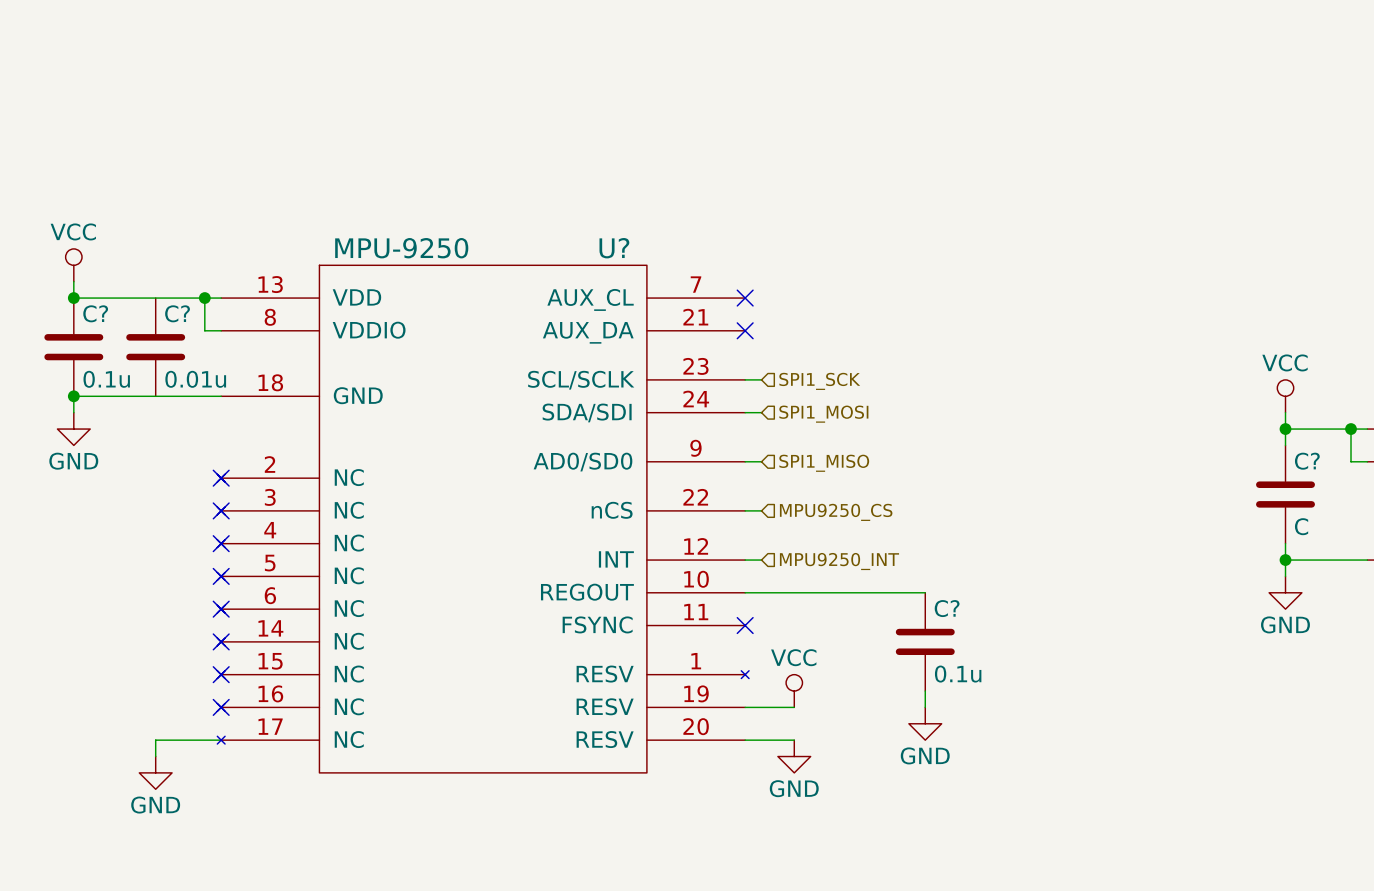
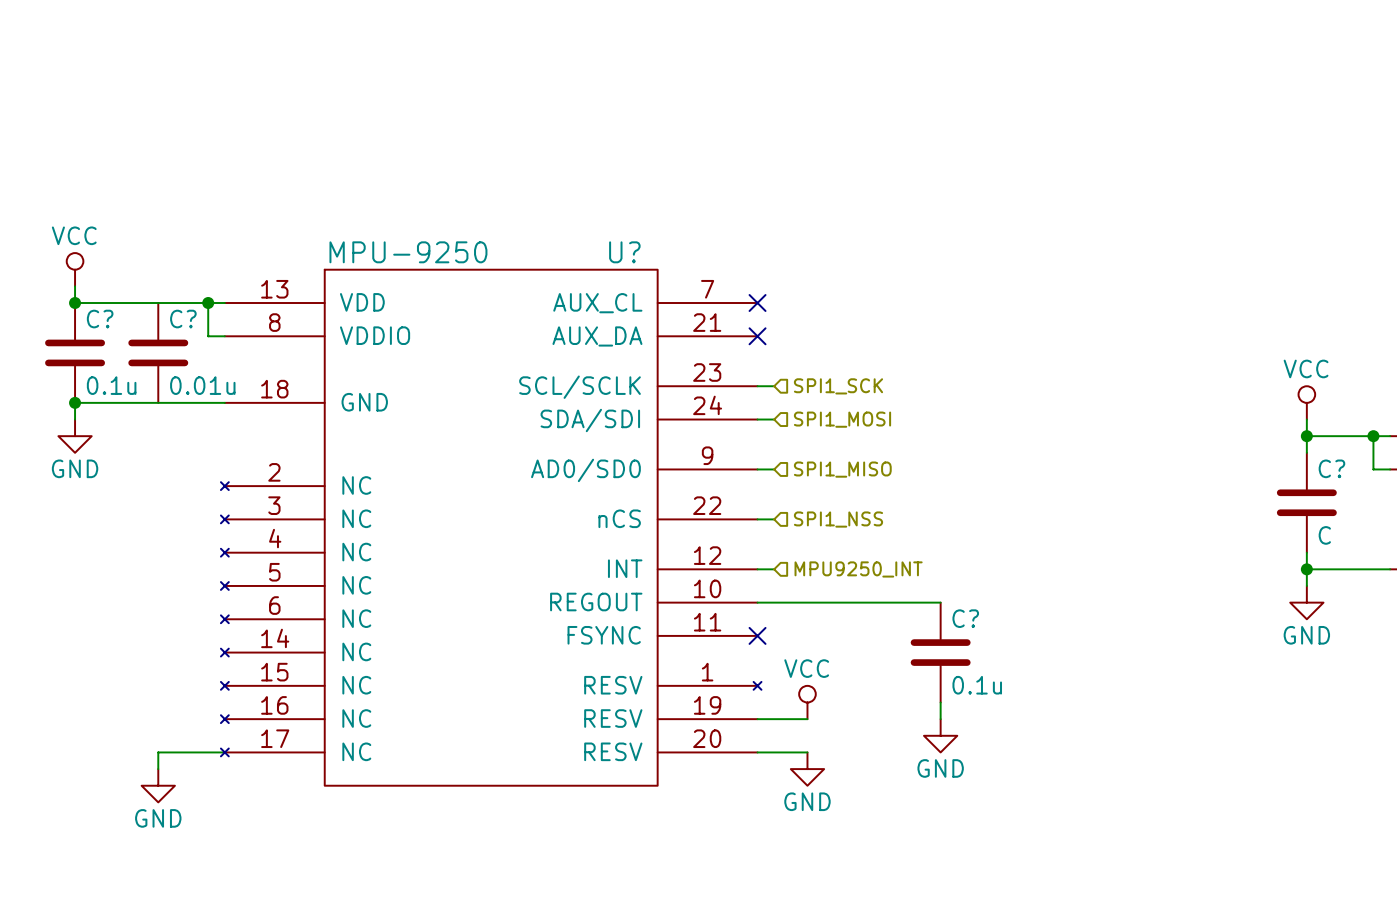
no-connect mark: (221, 478) -> none
no-connect mark: (221, 510) -> none
hierarchical label: MPU9250_CS (836, 512) -> SPI1_NSS (838, 519)
no-connect mark: (221, 543) -> none
no-connect mark: (221, 576) -> none
no-connect mark: (221, 609) -> none
no-connect mark: (221, 641) -> none
no-connect mark: (221, 674) -> none
no-connect mark: (221, 707) -> none

